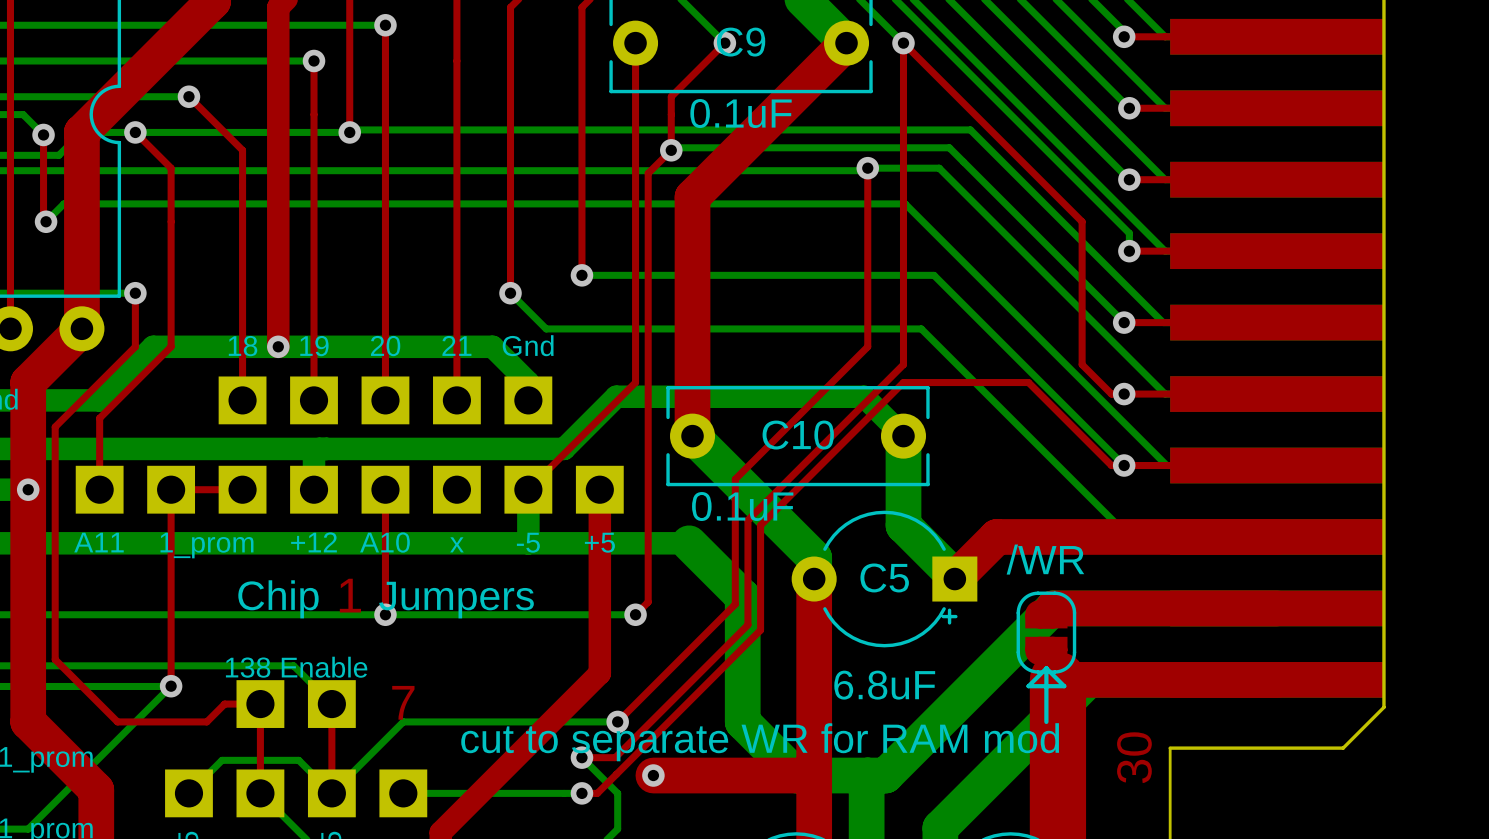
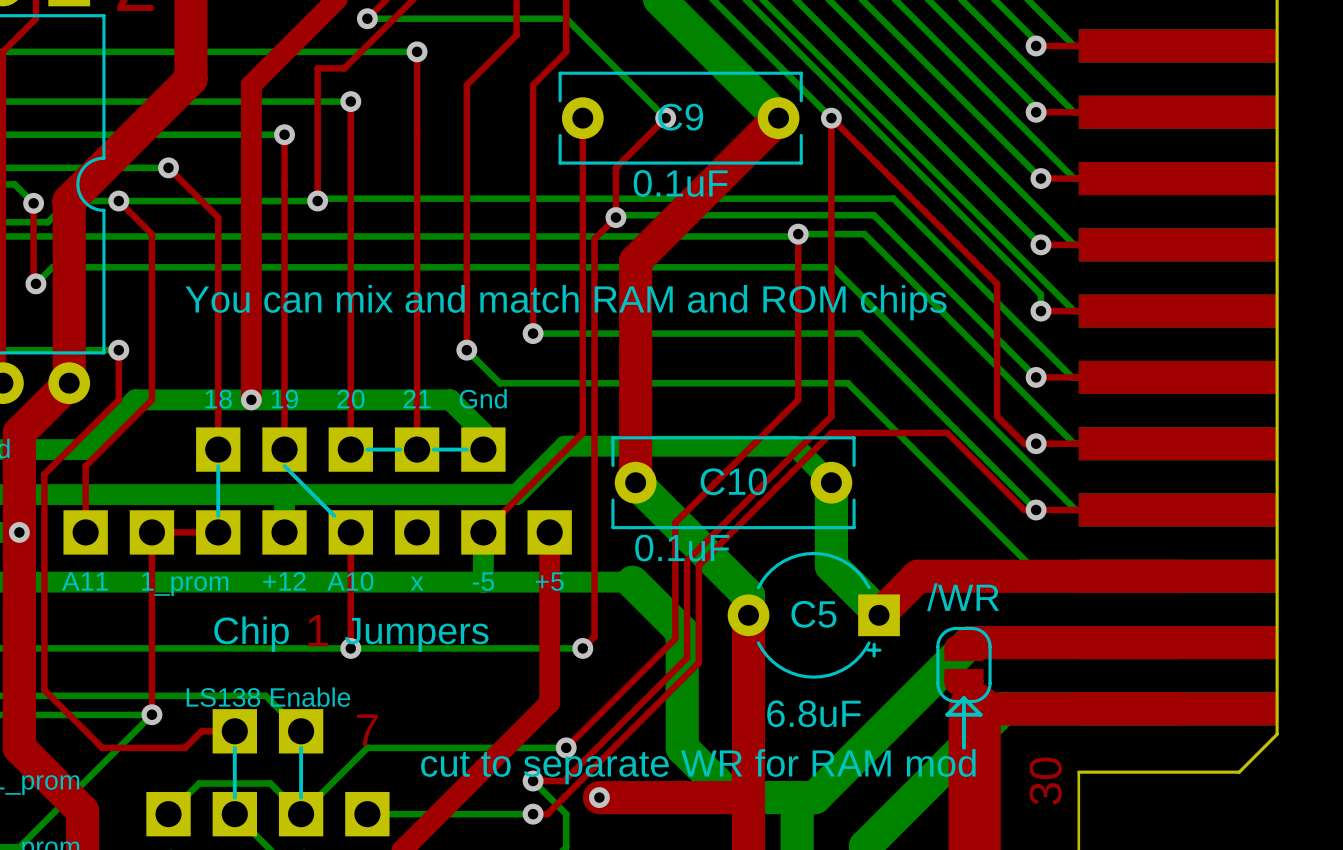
text: none -> You can mix and match RAM and ROM chips (565, 302)
line: none -> (367, 449) (400, 449)
line: none -> (433, 449) (466, 449)
line: none -> (218, 466) (218, 515)
line: none -> (284, 466) (334, 515)
text: 138 Enable (296, 667) -> LS138 Enable (268, 697)
top track: (260, 704) (260, 793) -> none
top track: (331, 704) (331, 793) -> none
line: none -> (234, 747) (234, 797)
line: none -> (301, 747) (301, 797)

